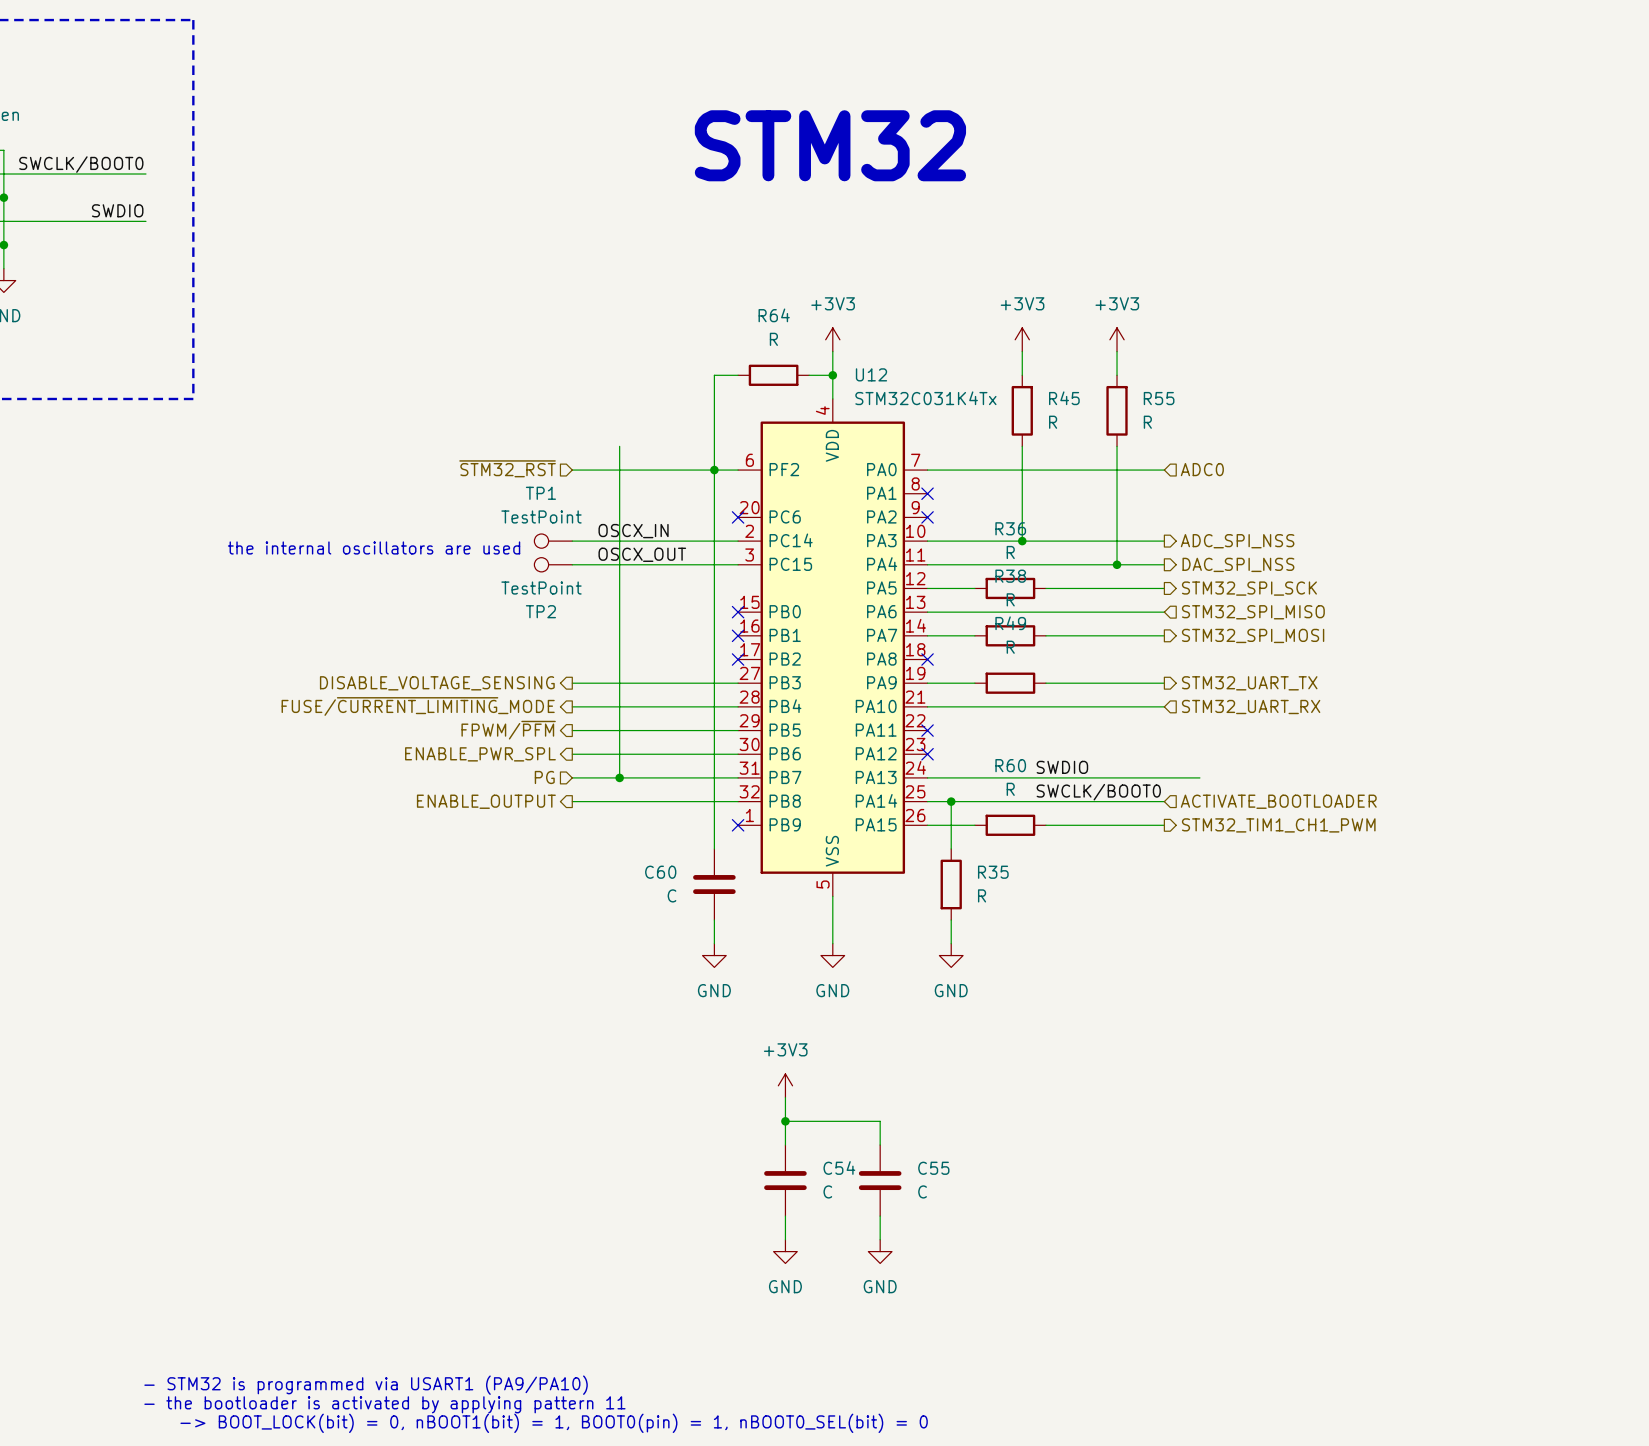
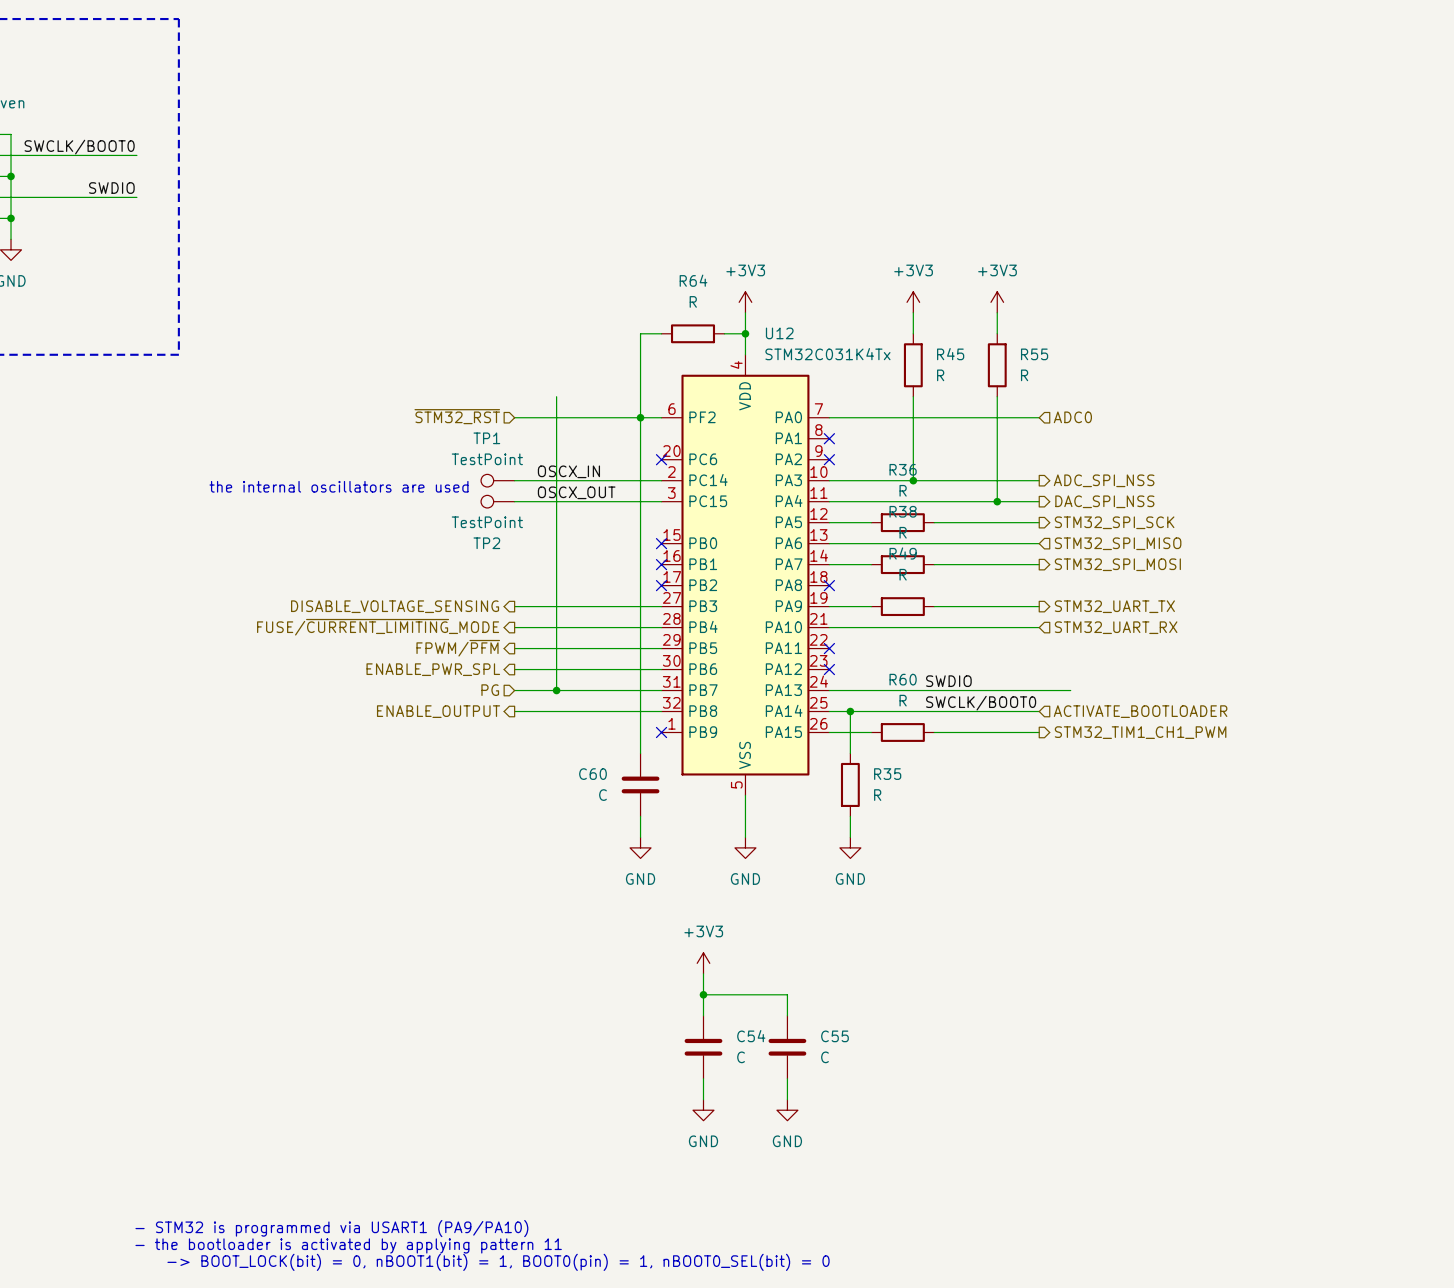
text: STM32 (830, 145) -> none

